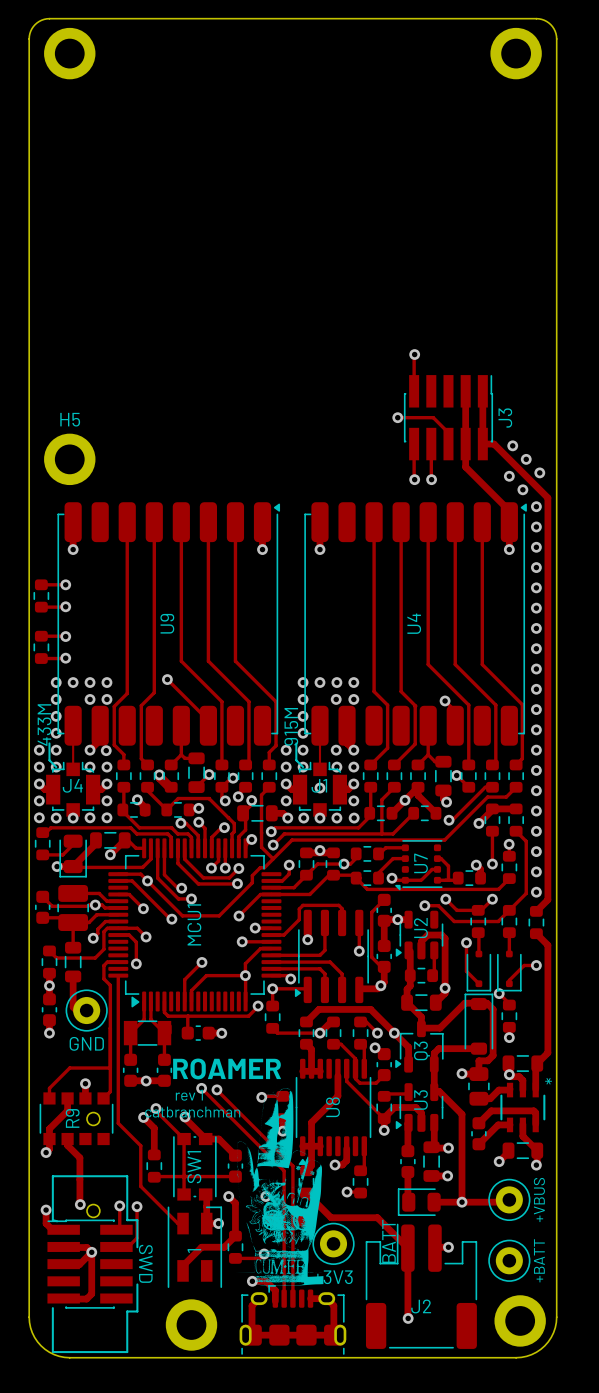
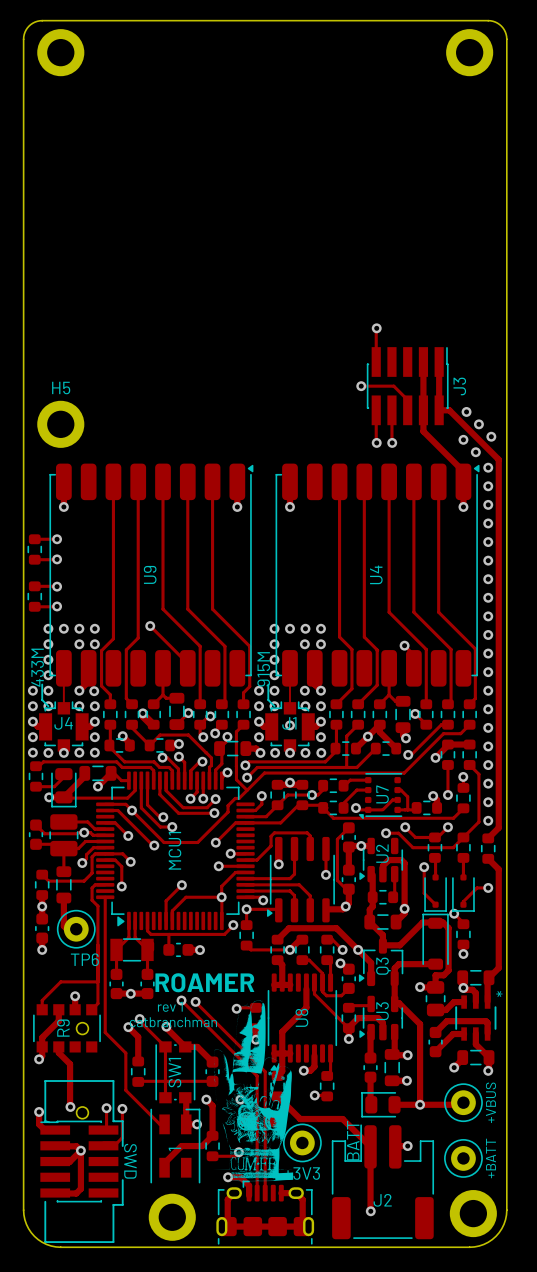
GND name: GND (86, 1043) -> TP6 (84, 959)

